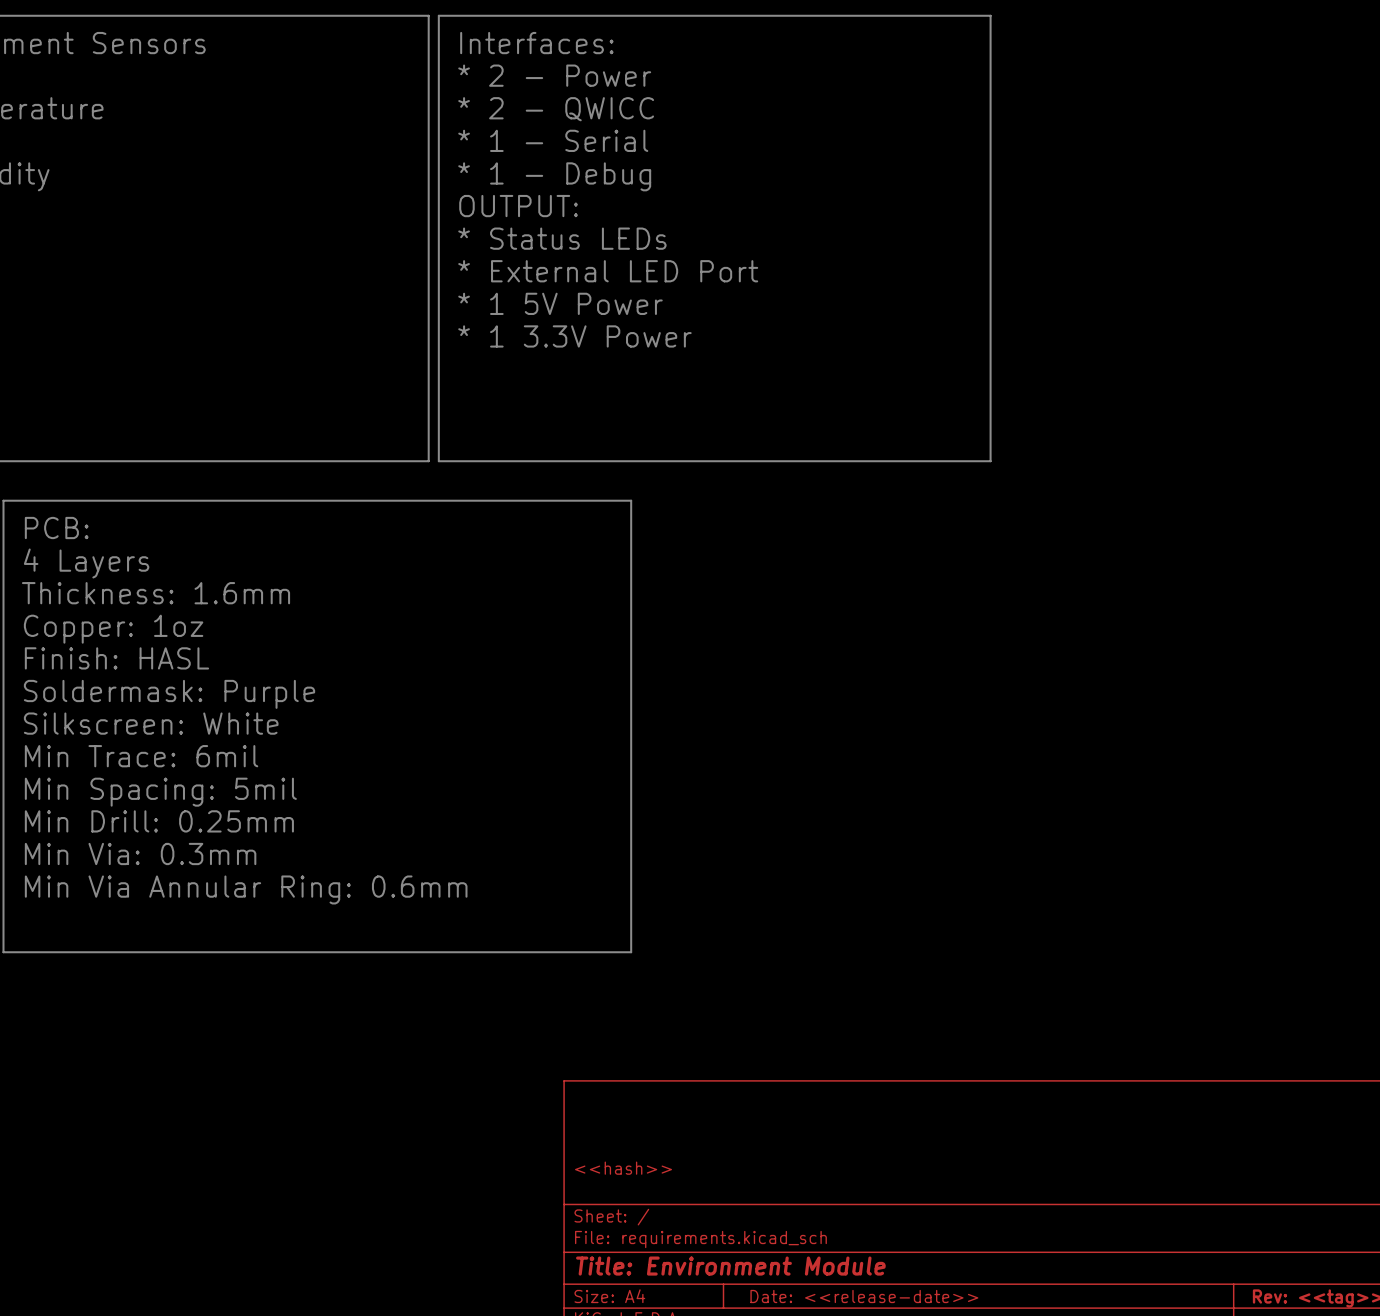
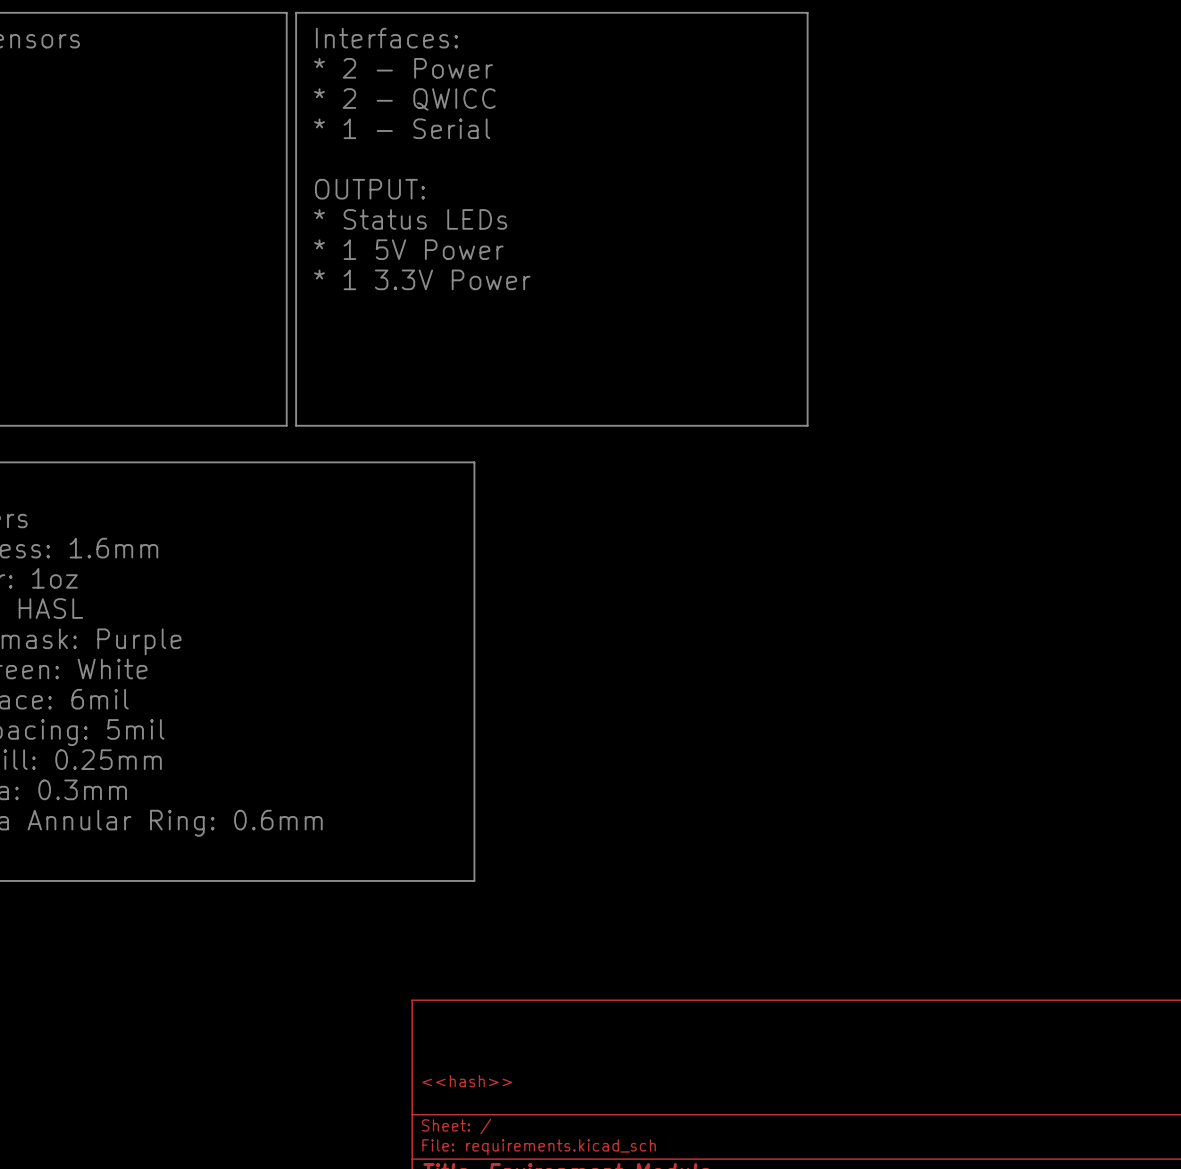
text: * 1 - Debug (554, 176) -> none
text: * External LED Port (608, 271) -> * 1 5V Power (408, 249)
text: * 1 5V Power (560, 303) -> * 1 3.3V Power (422, 279)
text: * 1 3.3V Power (574, 336) -> none

